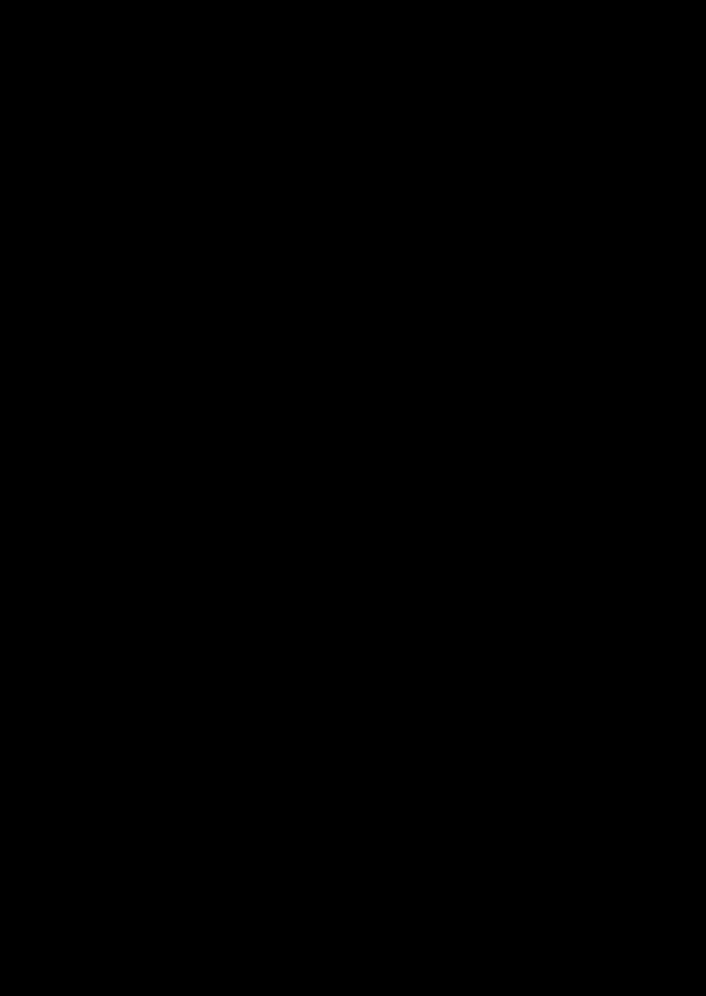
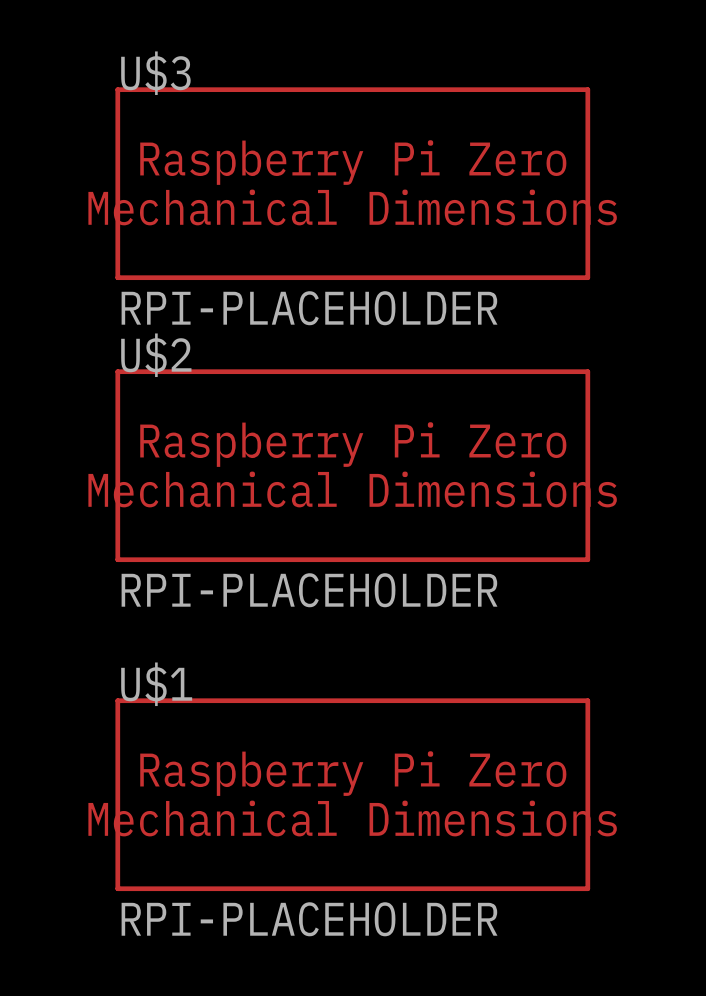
U$3: none -> RPI-PLACEHOLDER (352, 183)
U$2: none -> RPI-PLACEHOLDER (352, 465)
U$1: none -> RPI-PLACEHOLDER (352, 794)

